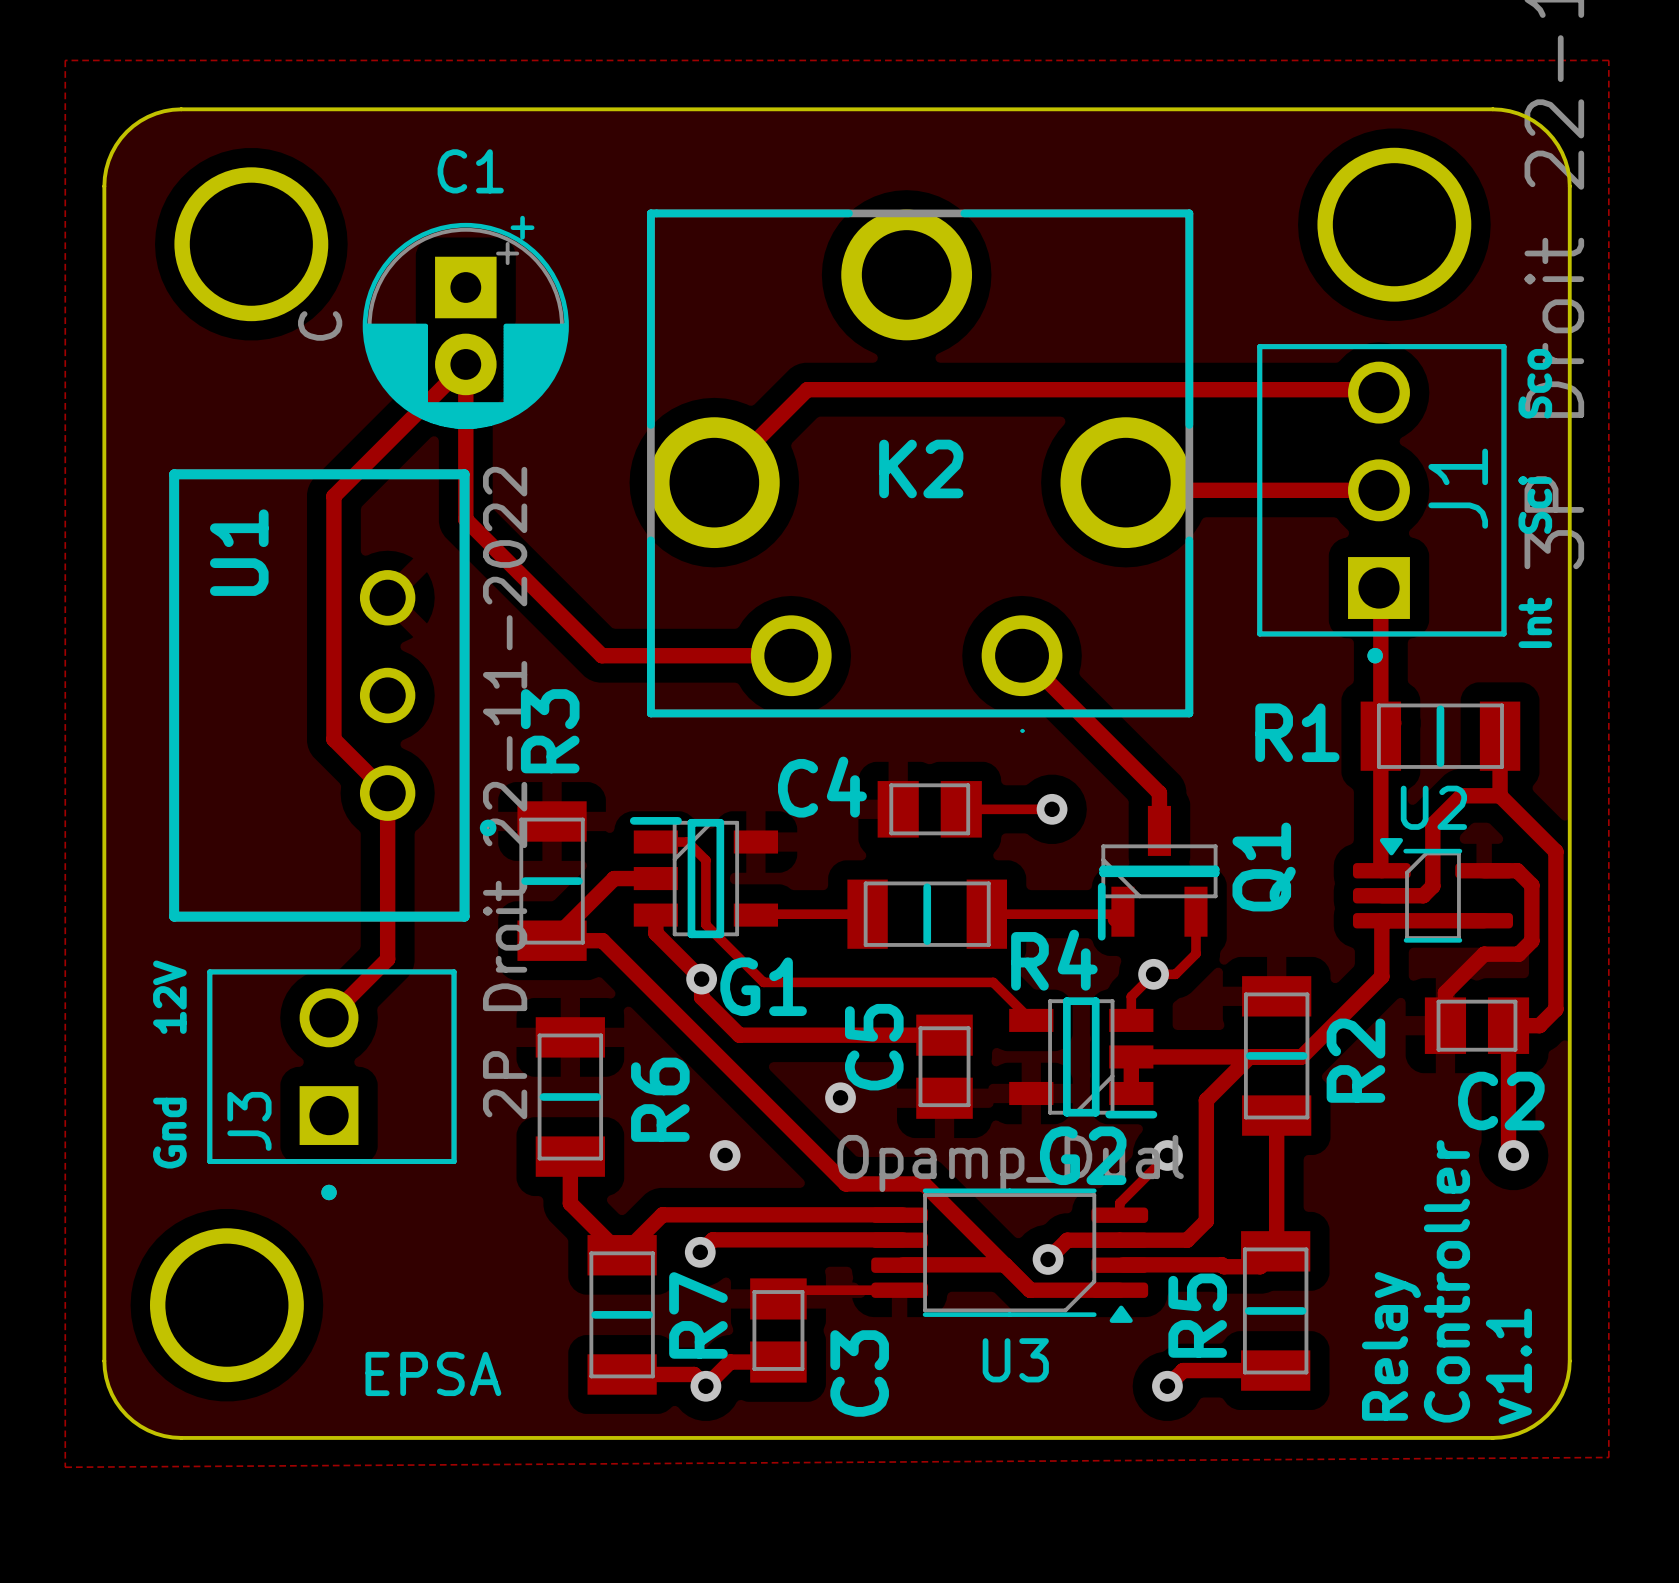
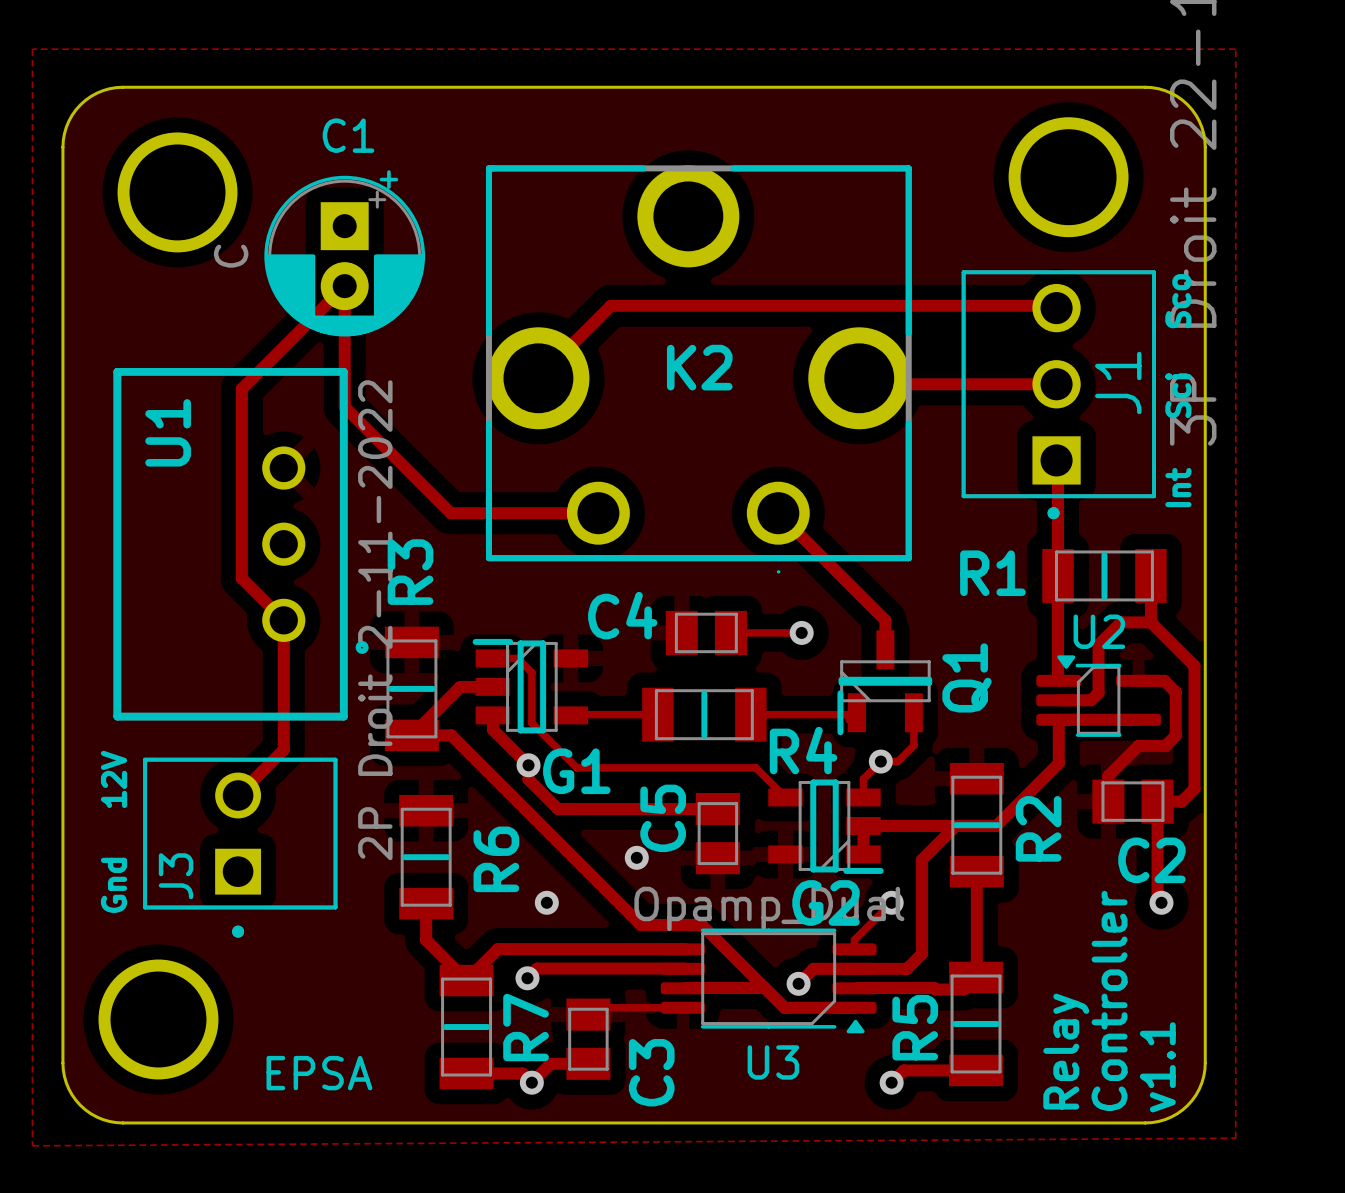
J3 value: 2P Droit 22-11-2022 (505, 793) -> 2P Droit 2-11-2022 (375, 620)

